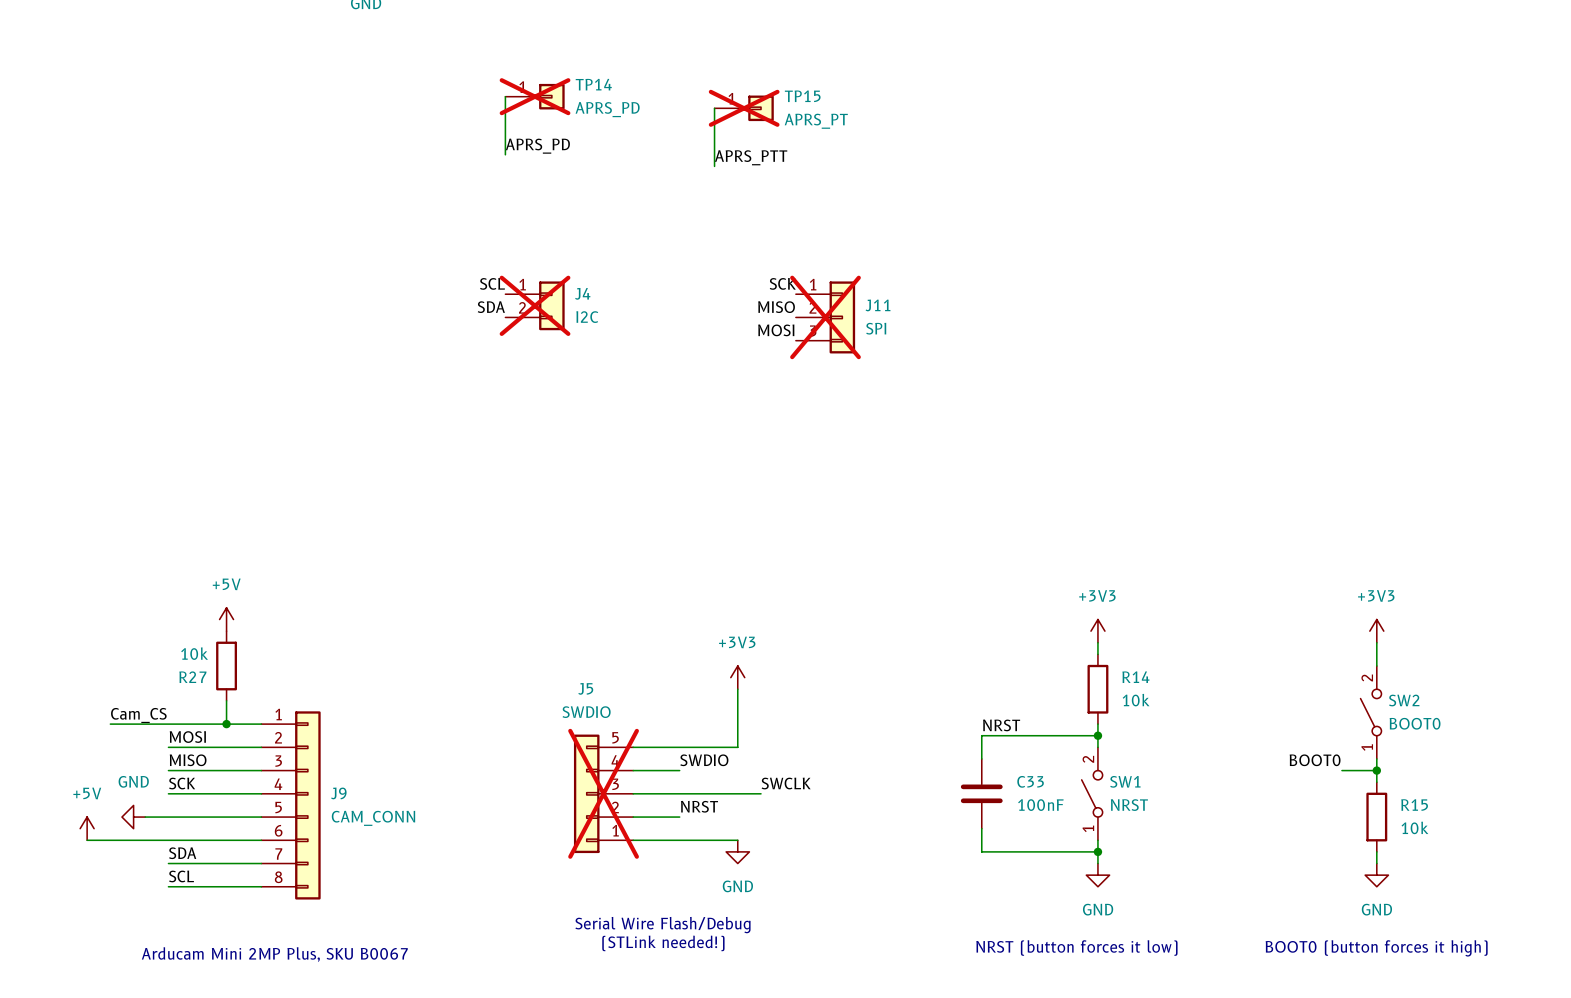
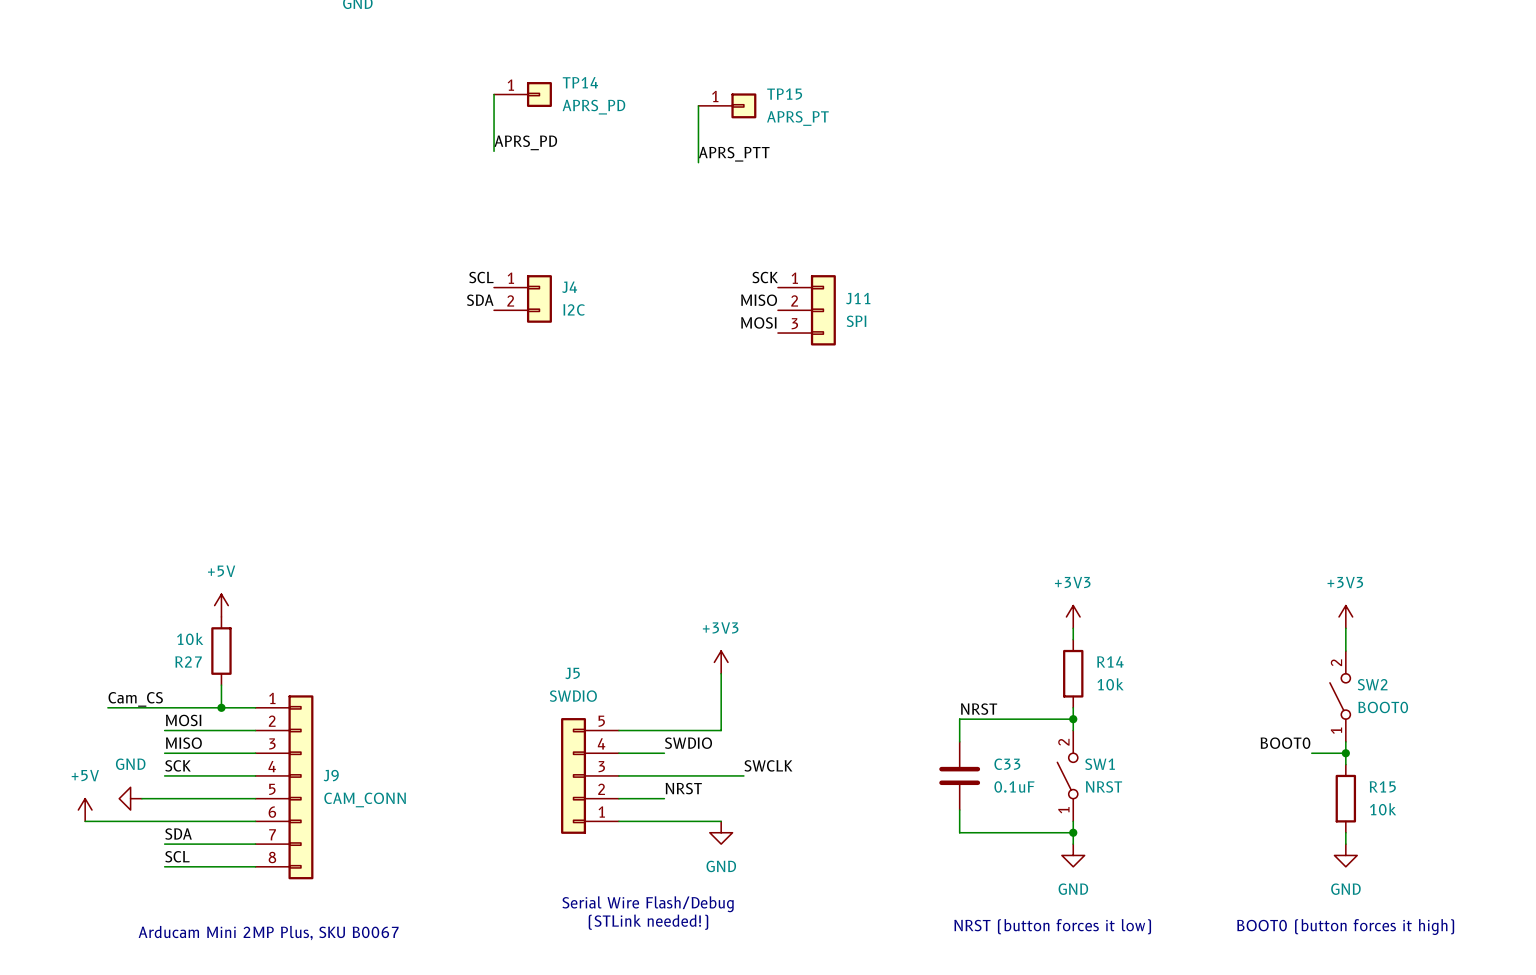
TP14 do-not-place cross: (535, 96) -> none
TP15 do-not-place cross: (744, 108) -> none
J4 do-not-place cross: (535, 305) -> none
J11 do-not-place cross: (825, 317) -> none
J5 do-not-place cross: (603, 793) -> none
C33 value: 100nF (1040, 805) -> 0.1uF (1014, 786)

